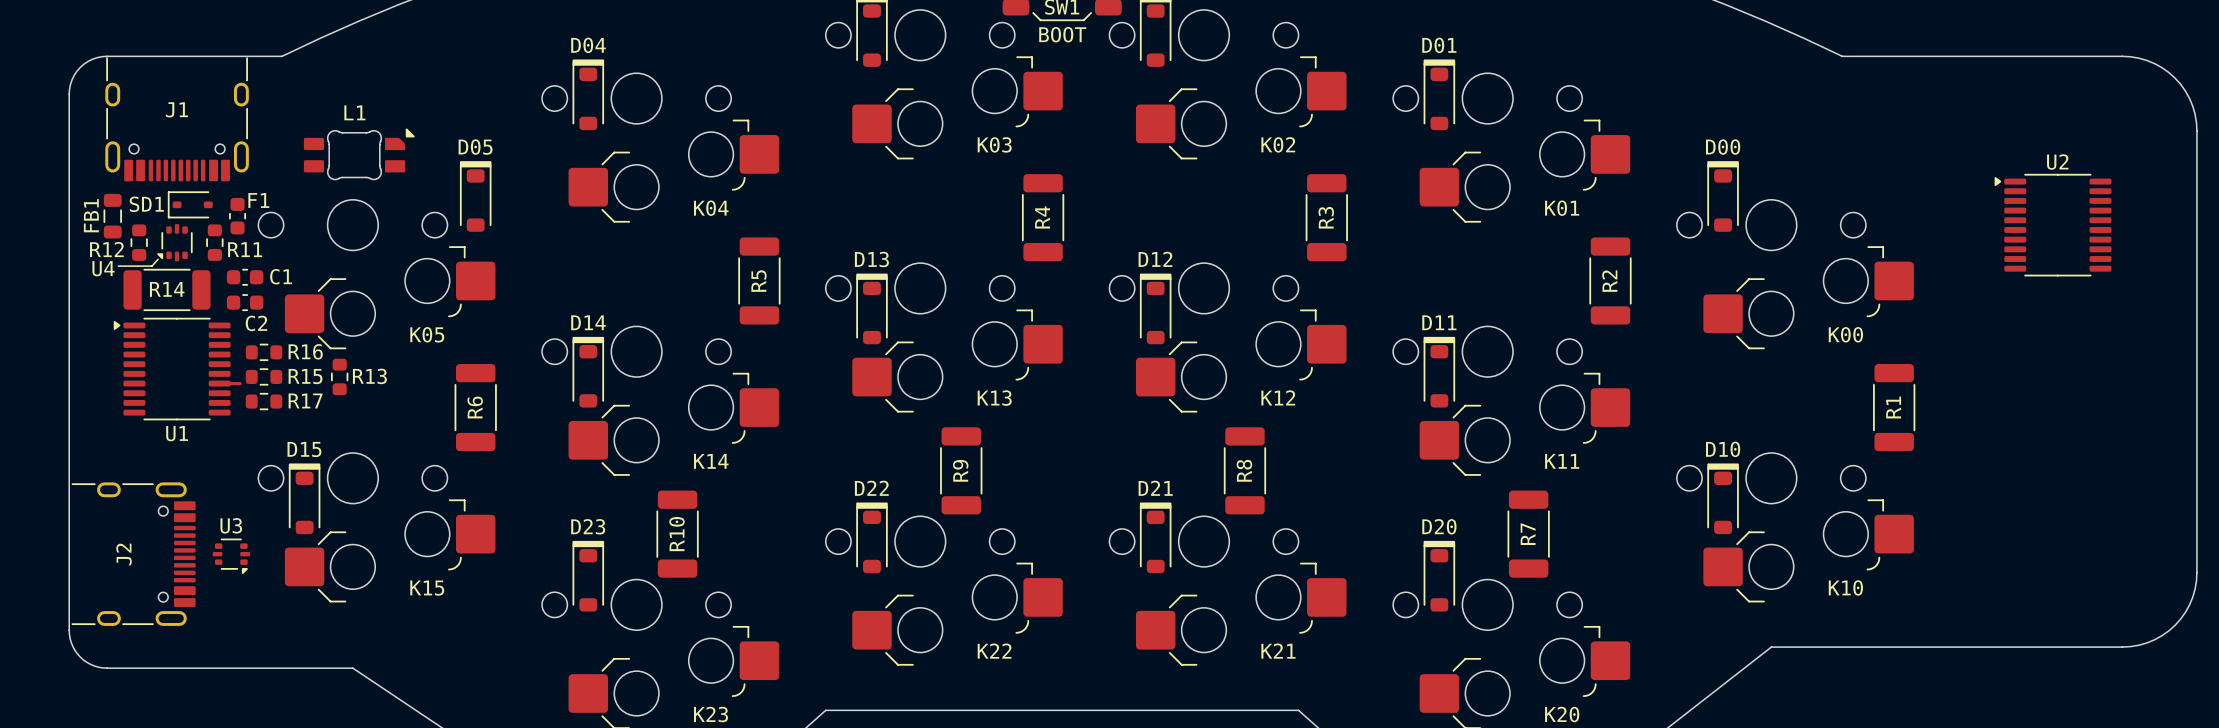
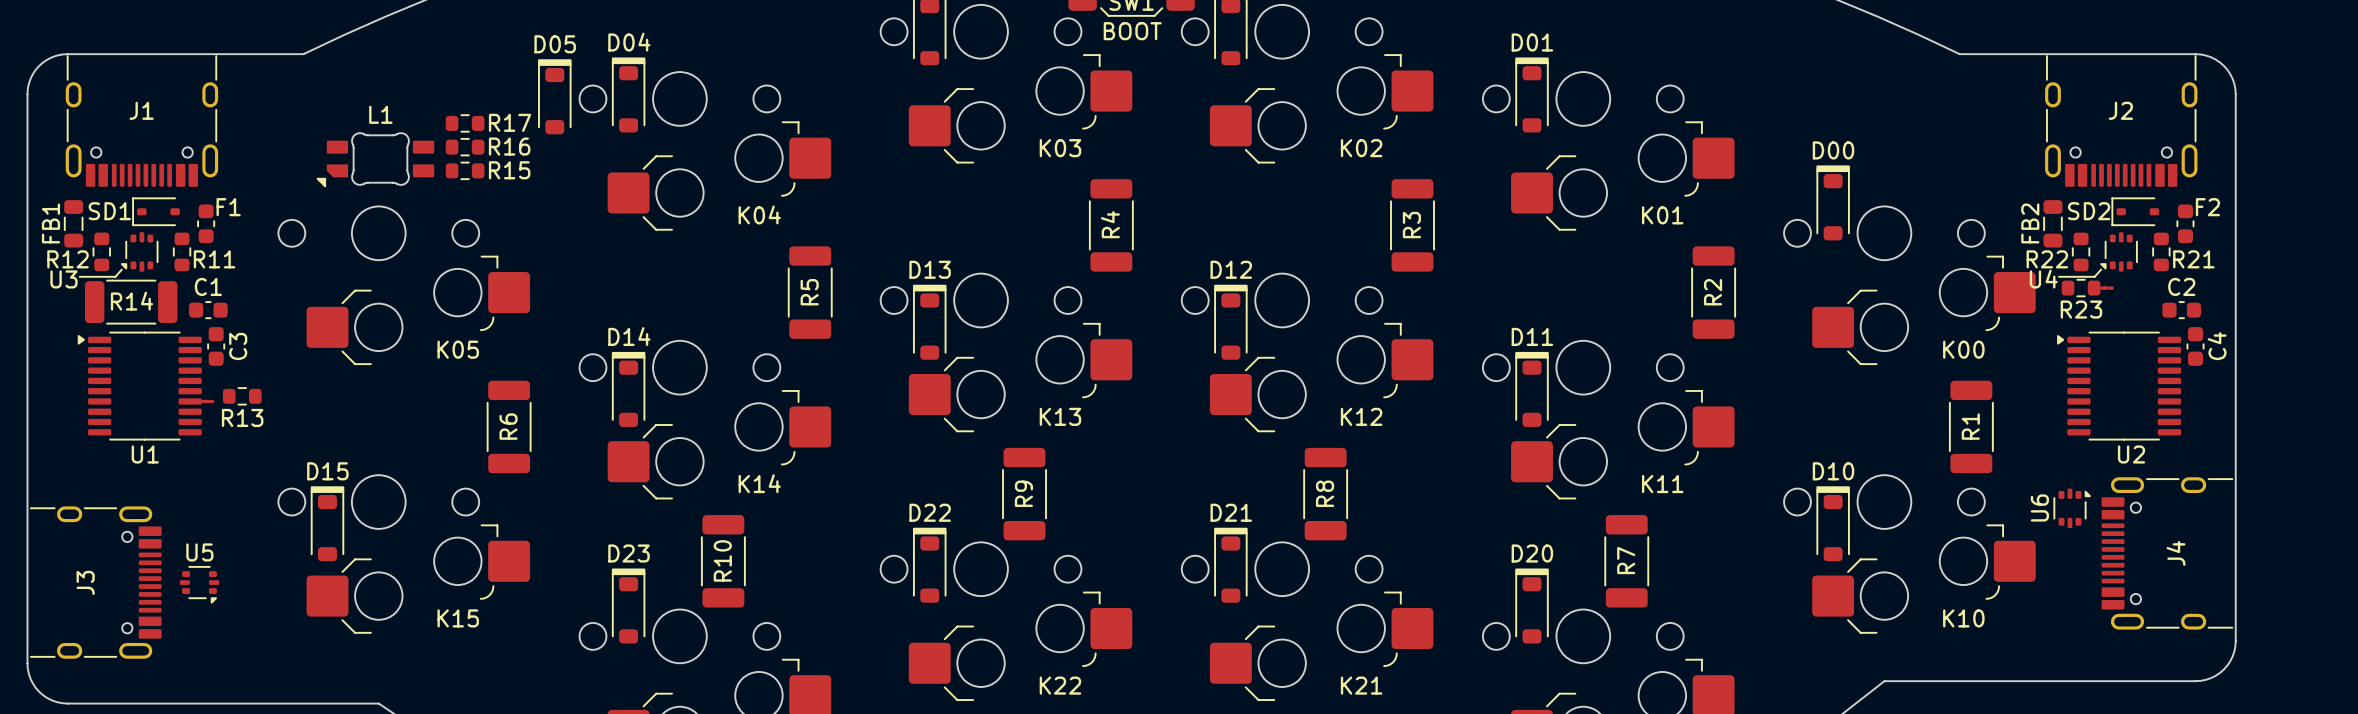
board edge: (107, 56) (92, 59) (80, 67) (72, 79) (69, 94) (69, 634) (75, 650) (83, 659) (94, 666) (107, 668) -> (117, 54) (63, 54) (50, 58) (42, 62) (33, 72) (28, 85) (27, 94) (27, 668) (35, 687) (52, 700) (67, 703) (117, 703)
board edge: (2064, 56) (2130, 56) (2147, 60) (2162, 67) (2175, 78) (2185, 91) (2192, 106) (2196, 130) (2196, 572) (2195, 589) (2189, 604) (2180, 619) (2168, 630) (2154, 639) (2130, 646) (2064, 647) -> (2195, 54) (2210, 57) (2223, 65) (2232, 78) (2235, 94) (2235, 646) (2230, 661) (2220, 672) (2205, 679) (2195, 681)
J1 position: (177, 119) -> (141, 120)
L1 rotation: 0° (359, 154) -> 180° (375, 159)
U2 name position: U2 (2057, 162) -> U2 (2131, 454)
D05 position: (475, 196) -> (554, 96)
SD1 position: (190, 204) -> (155, 211)
SD2: none -> (2135, 211)
FB1 position: (112, 216) -> (73, 223)
F1 position: (237, 216) -> (206, 223)
FB2: none -> (2052, 223)
F2: none -> (2185, 223)
U2 position: (2053, 225) -> (2119, 386)
R12 position: (139, 242) -> (101, 251)
U4 position: (174, 242) -> (2119, 251)
R11 position: (214, 242) -> (182, 251)
R22: none -> (2081, 251)
R21: none -> (2161, 251)
line: (158, 259) (152, 266) (118, 266) -> (121, 269) (115, 276) (79, 276)
line: none -> (2101, 269) (2094, 276) (2058, 276)
C1 name position: C1 (281, 276) -> C1 (208, 286)
R23: none -> (2081, 288)
part: none -> (2104, 288)
C1 position: (245, 277) -> (208, 310)
R14 position: (166, 289) -> (131, 302)
C2 position: (245, 302) -> (2181, 310)
C2 name position: C2 (256, 323) -> C2 (2181, 286)
C3: none -> (216, 346)
C4: none -> (2195, 346)
R16 position: (264, 352) -> (465, 147)
U1 position: (172, 369) -> (139, 386)
R15 position: (264, 376) -> (465, 170)
R13 rotation: 0° (339, 376) -> 90° clockwise (242, 396)
R13 position: (339, 376) -> (242, 396)
part position: (232, 383) -> (204, 401)
R17 position: (264, 401) -> (465, 123)
R1 position: (1894, 407) -> (1971, 426)
U6: none -> (2072, 508)
U3 name position: U3 (231, 525) -> U3 (63, 279)
J4: none -> (2167, 553)
J3: none -> (95, 582)
J2 rotation: 0° (133, 554) -> 90° clockwise (2121, 120)
J2 position: (133, 554) -> (2121, 120)
U5: none -> (199, 584)
U3 rotation: 0° (231, 556) -> 90° clockwise (139, 251)
U3 position: (231, 556) -> (139, 251)

